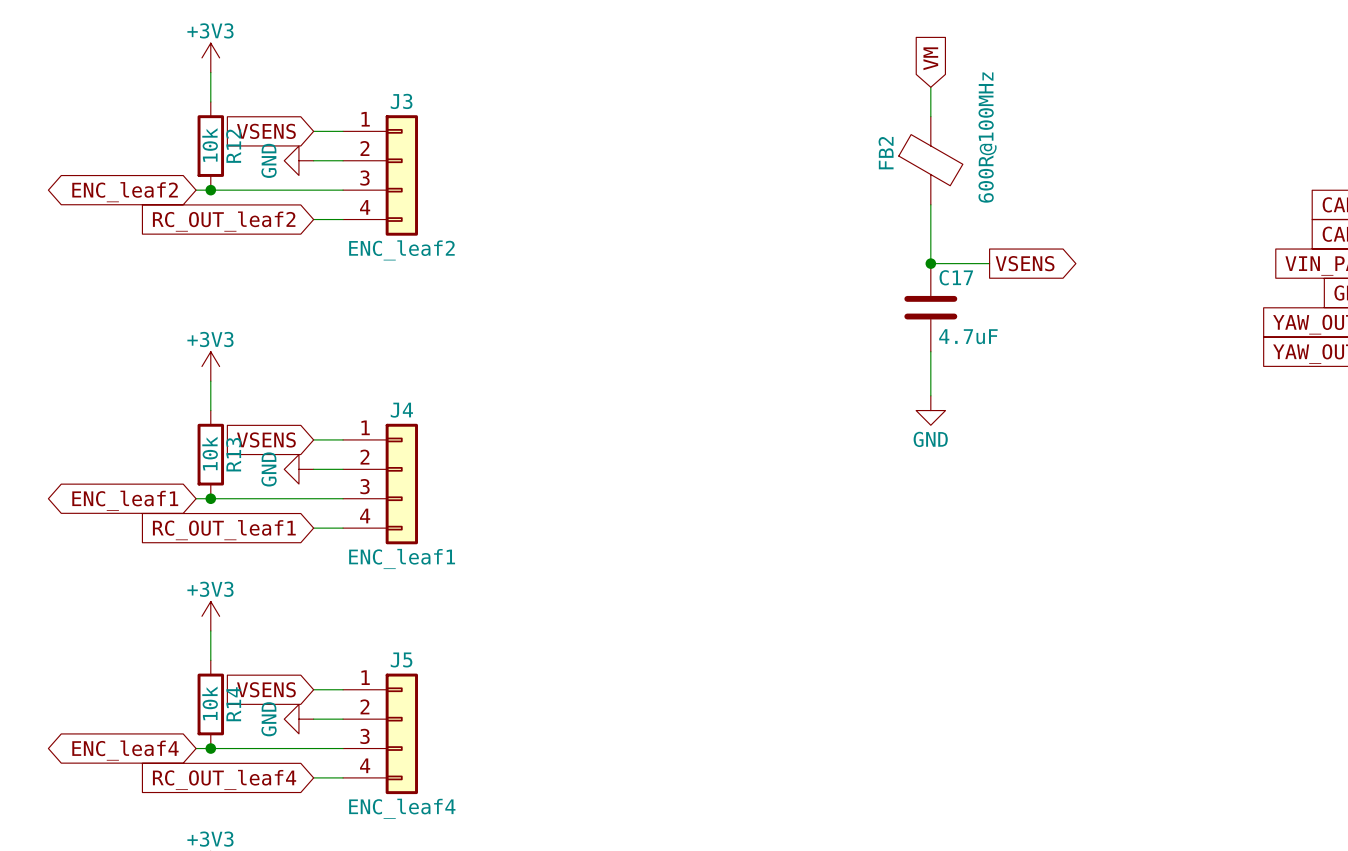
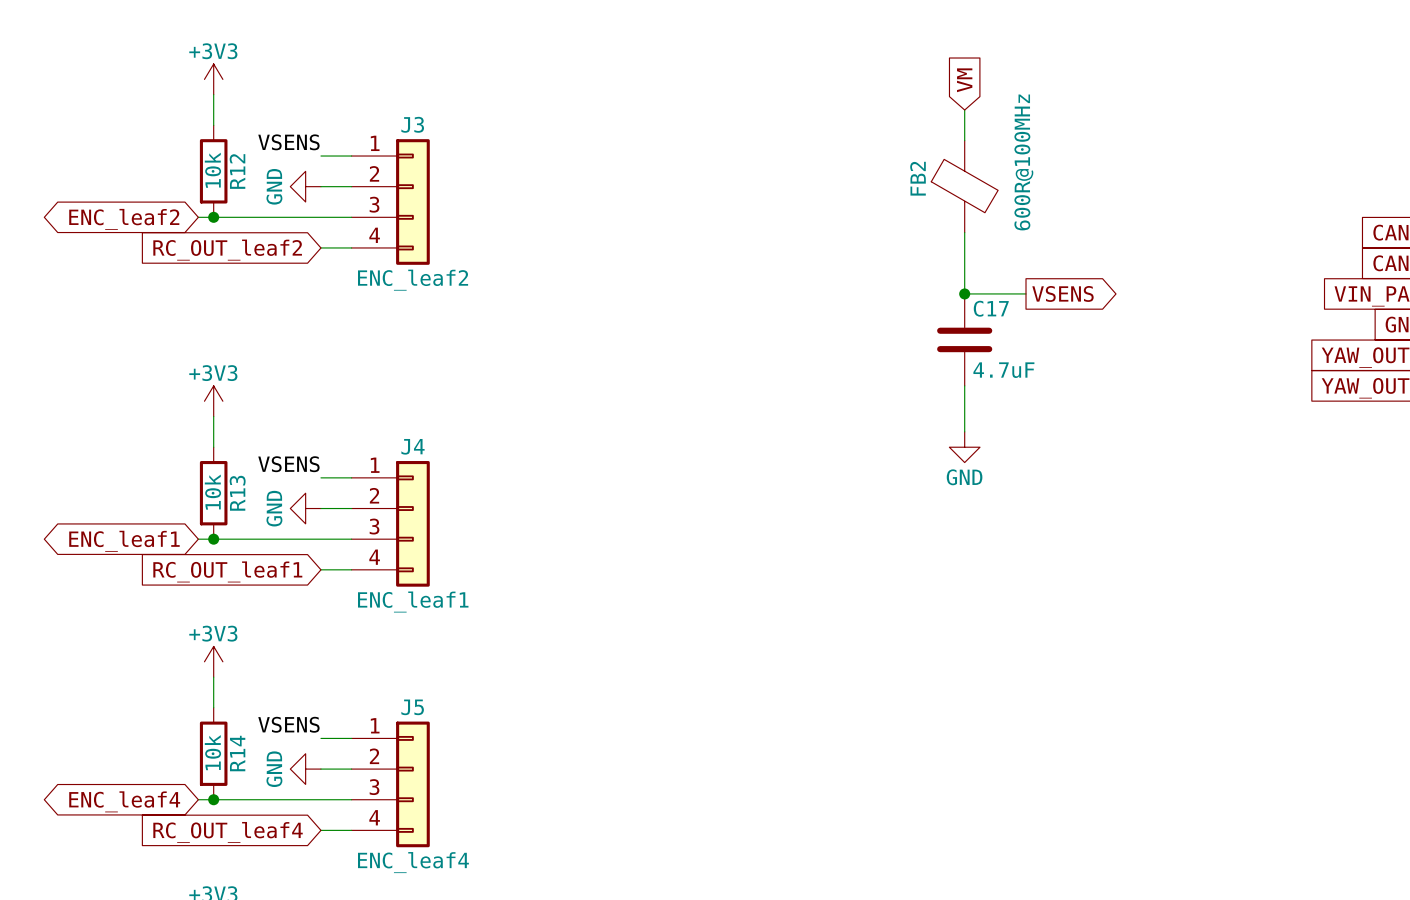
label: none -> VSENS (288, 142)
global label: VSENS (266, 131) -> none
label: none -> VSENS (288, 464)
global label: VSENS (266, 439) -> none
label: none -> VSENS (288, 724)
global label: VSENS (266, 689) -> none

